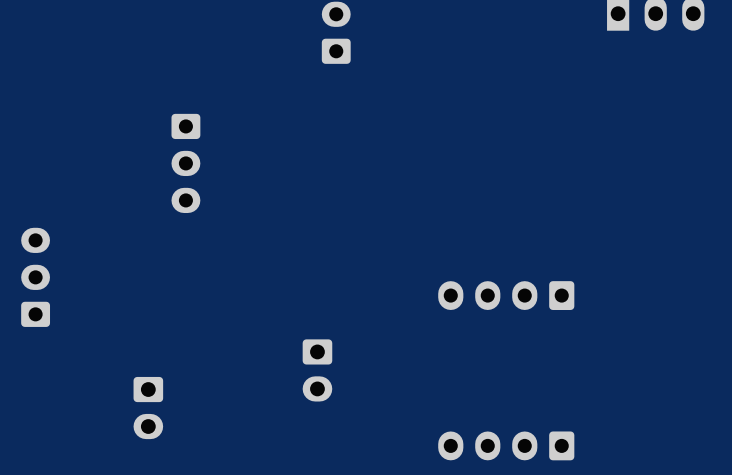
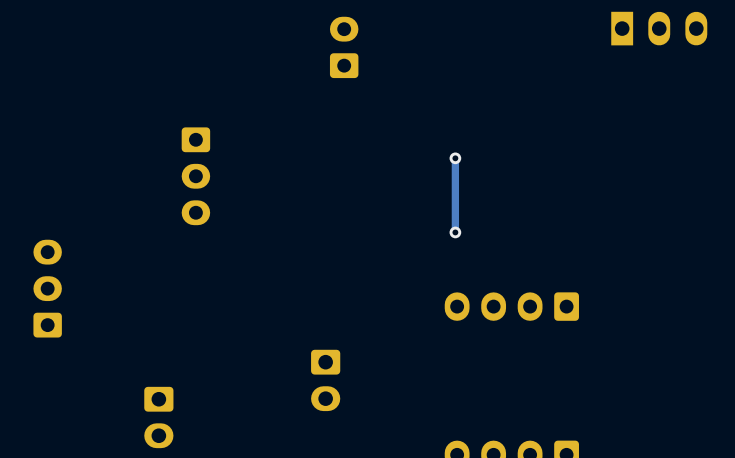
track: none -> (455, 158) (455, 232)
via: none -> (455, 158)
via: none -> (455, 232)

